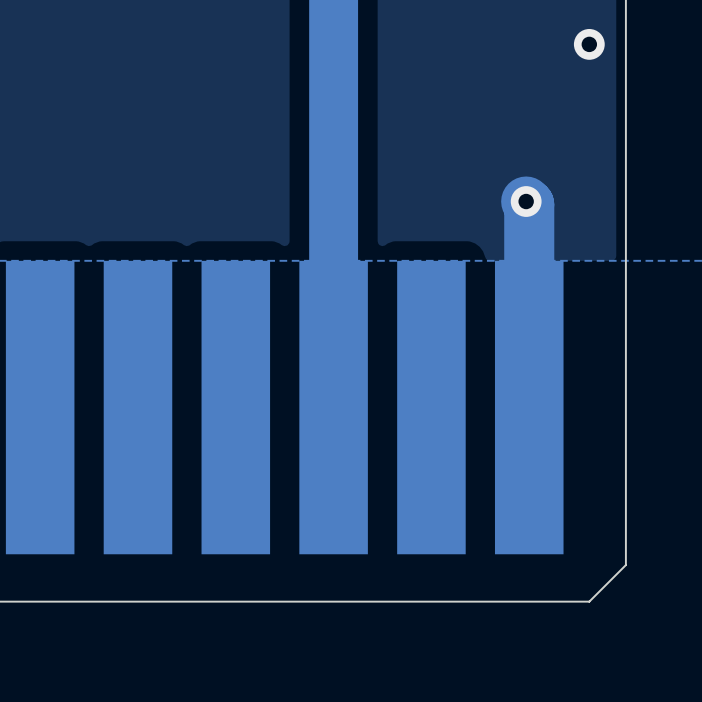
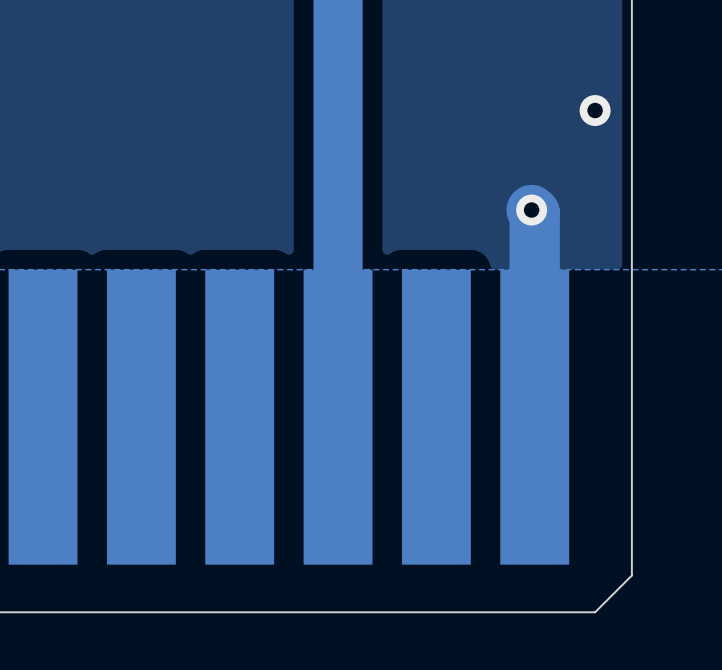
via: (589, 44) -> none
via: none -> (595, 110)

